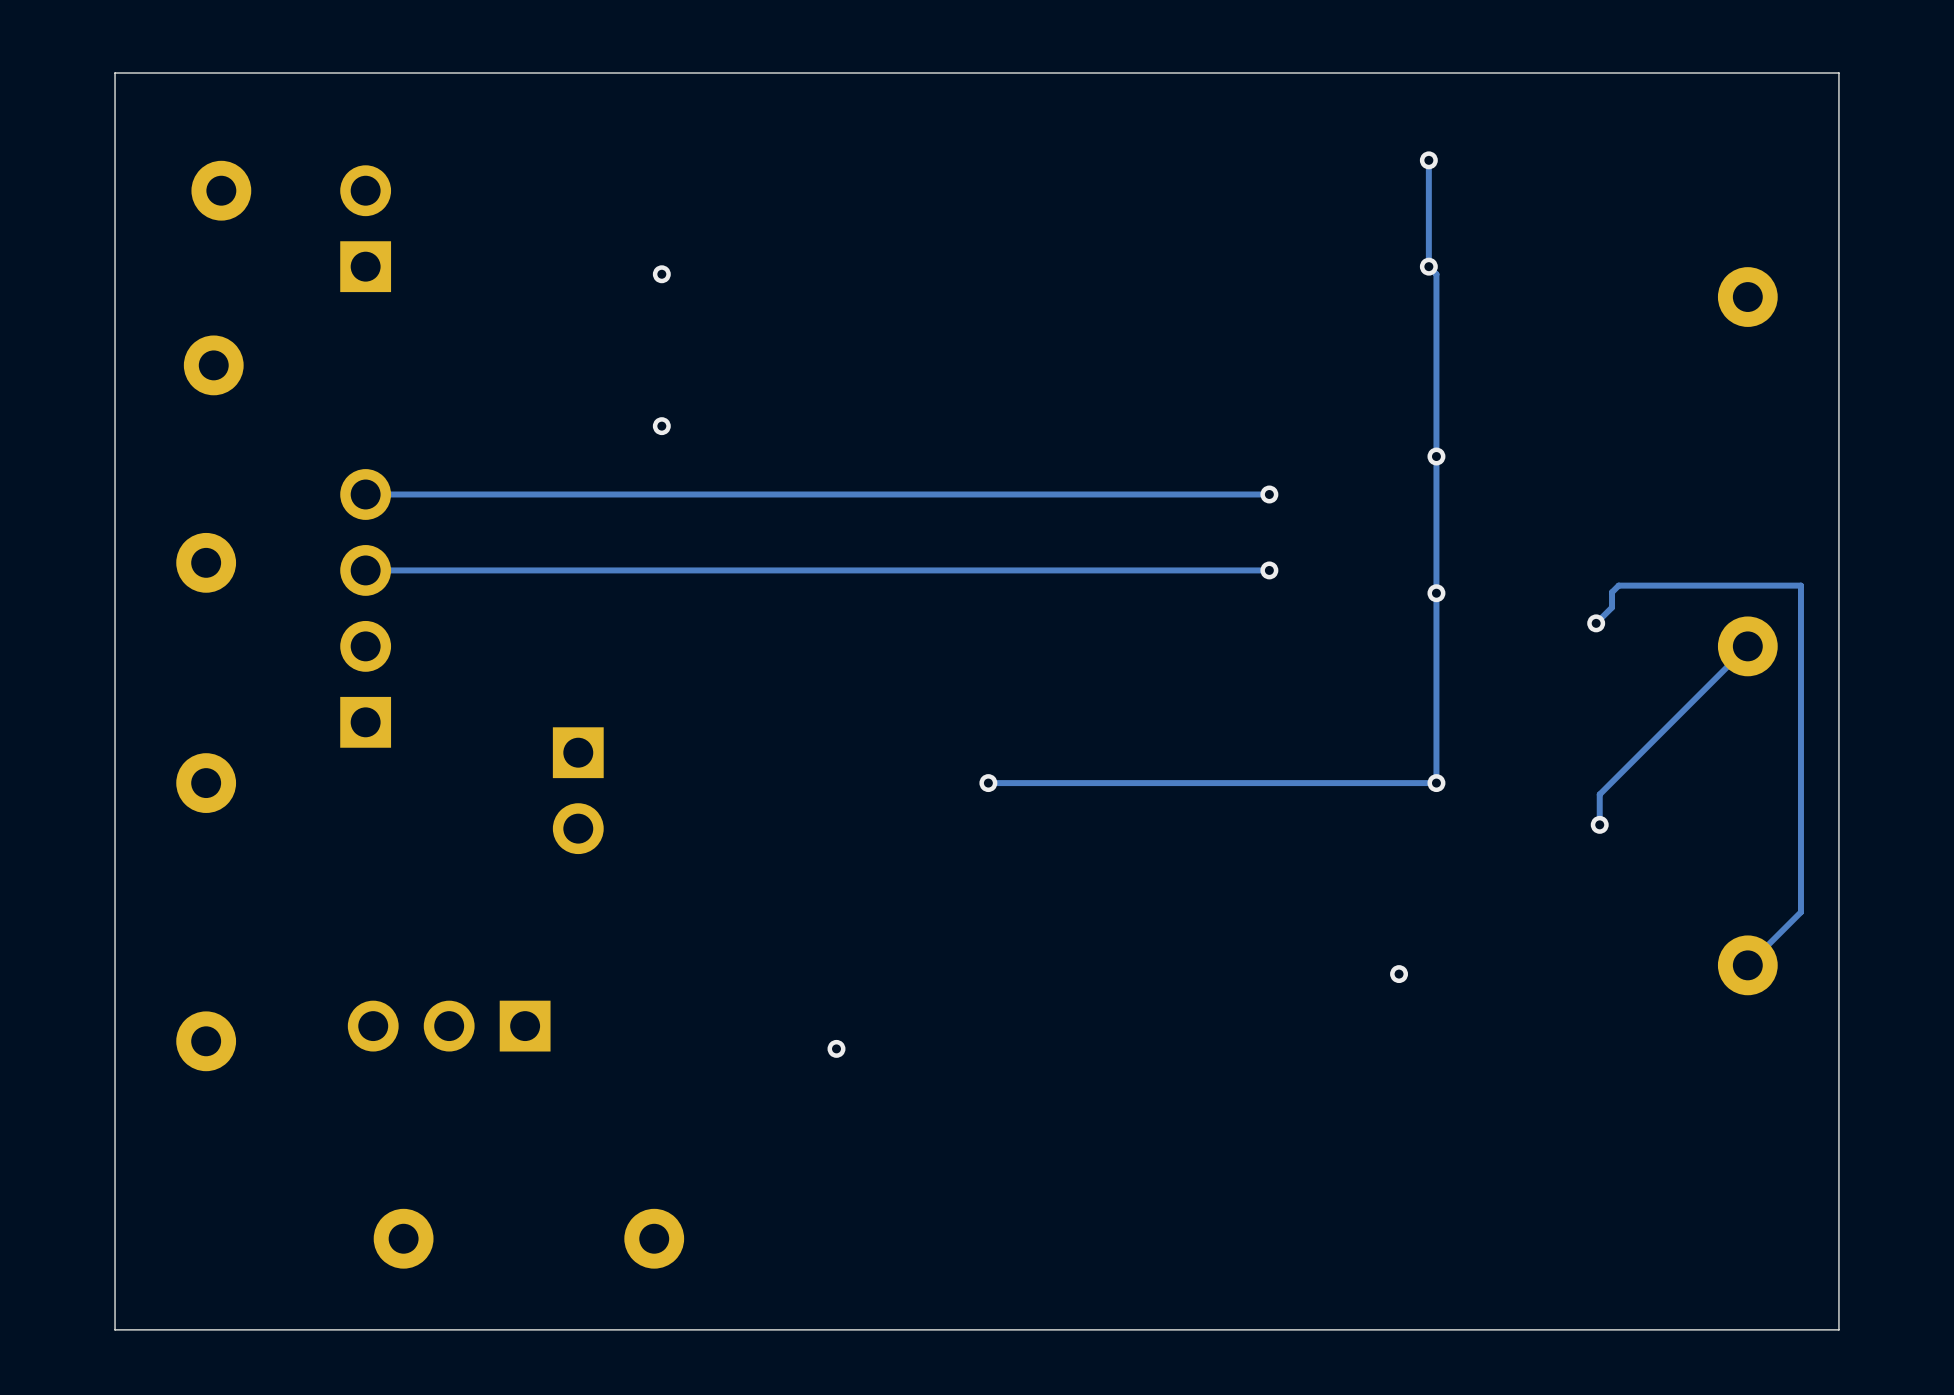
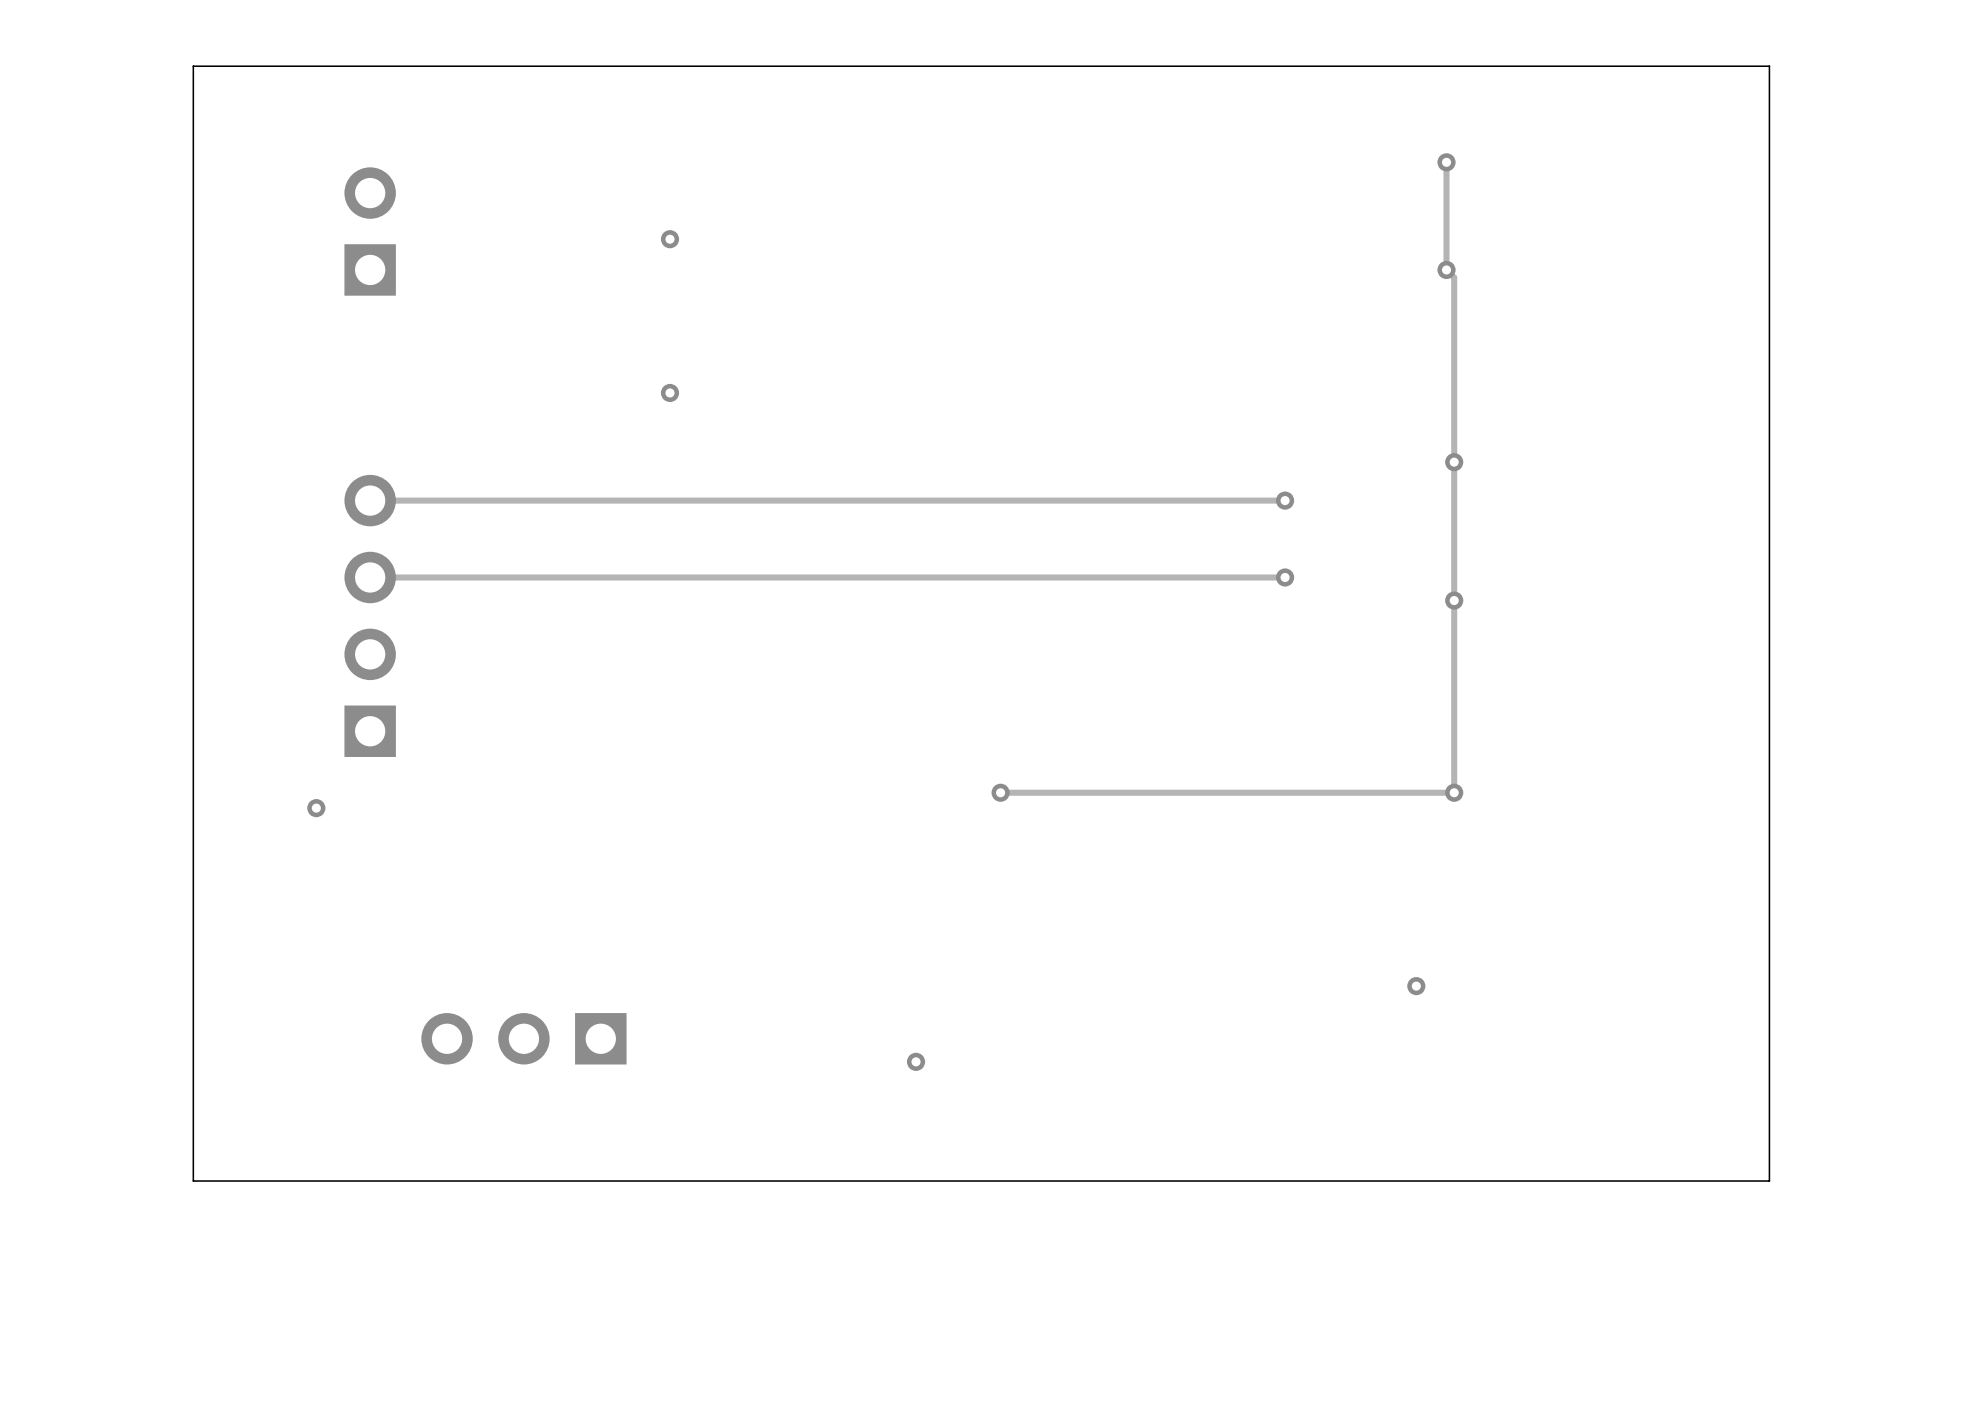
board edge: (1838, 73) (115, 73) (115, 1329) (1838, 1329) (1838, 73) -> (1769, 66) (1769, 1181) (193, 1181) (193, 66) (1769, 66)
part: (221, 190) -> none
via position: (661, 274) -> (670, 239)
part: (1747, 297) -> none
part: (213, 365) -> none
via position: (661, 426) -> (670, 392)
part: (206, 562) -> none
track: (1596, 623) (1612, 607) (1612, 592) (1618, 585) (1800, 585) (1800, 912) (1747, 965) -> none
via: (1596, 623) -> none
track: (1747, 646) (1599, 794) (1599, 824) -> none
part: (1747, 646) -> none
part: (206, 783) -> none
part: (578, 790) -> none
via: none -> (316, 808)
via: (1599, 824) -> none
part: (1747, 965) -> none
part position: (449, 1026) -> (523, 1038)
part: (206, 1041) -> none
via position: (836, 1048) -> (916, 1061)
part: (403, 1238) -> none
part: (654, 1238) -> none

